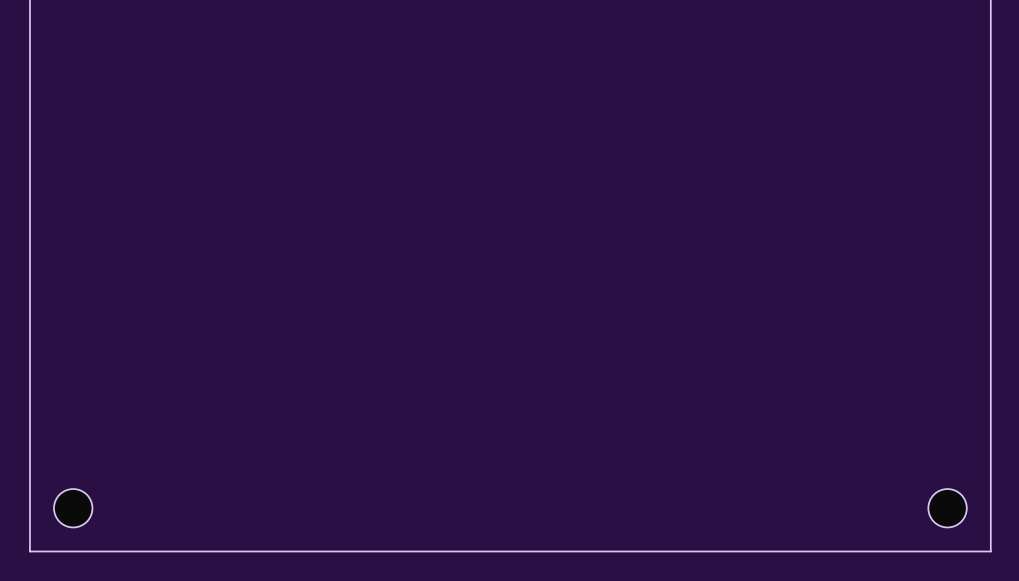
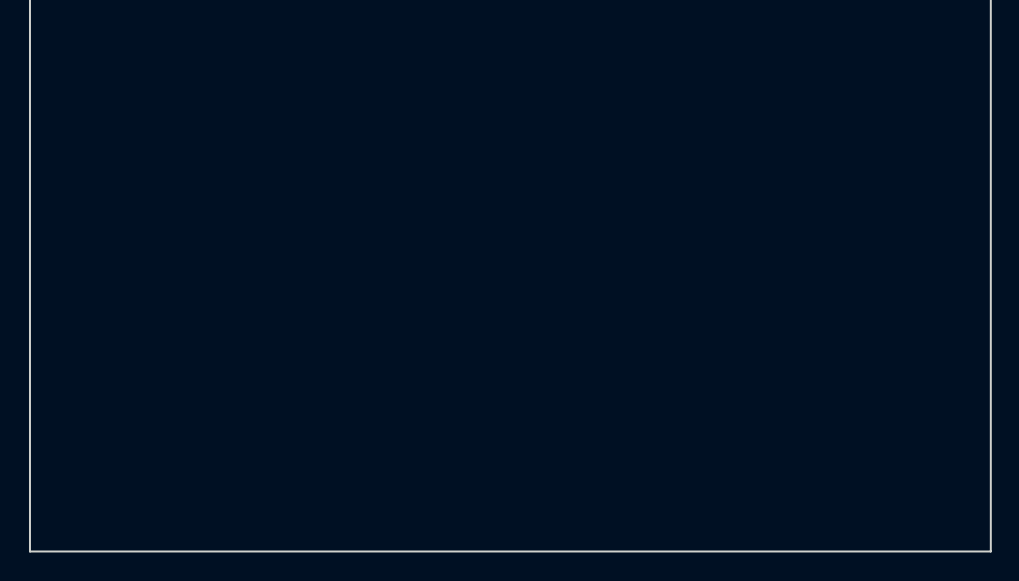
part: (73, 508) -> none
part: (947, 508) -> none

